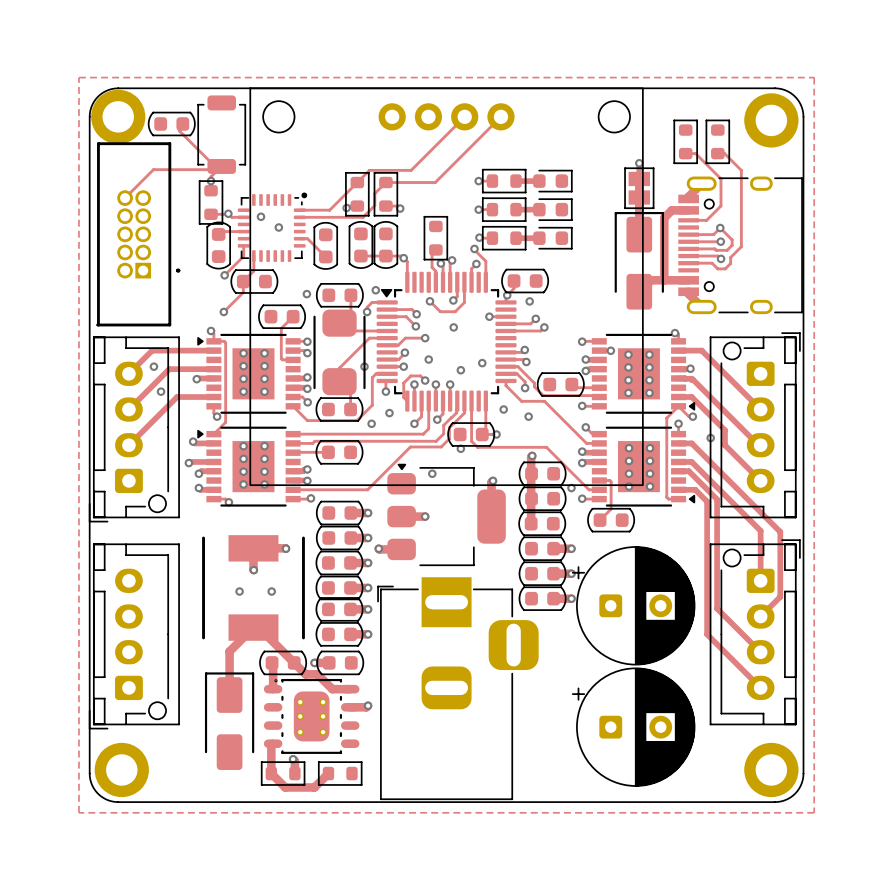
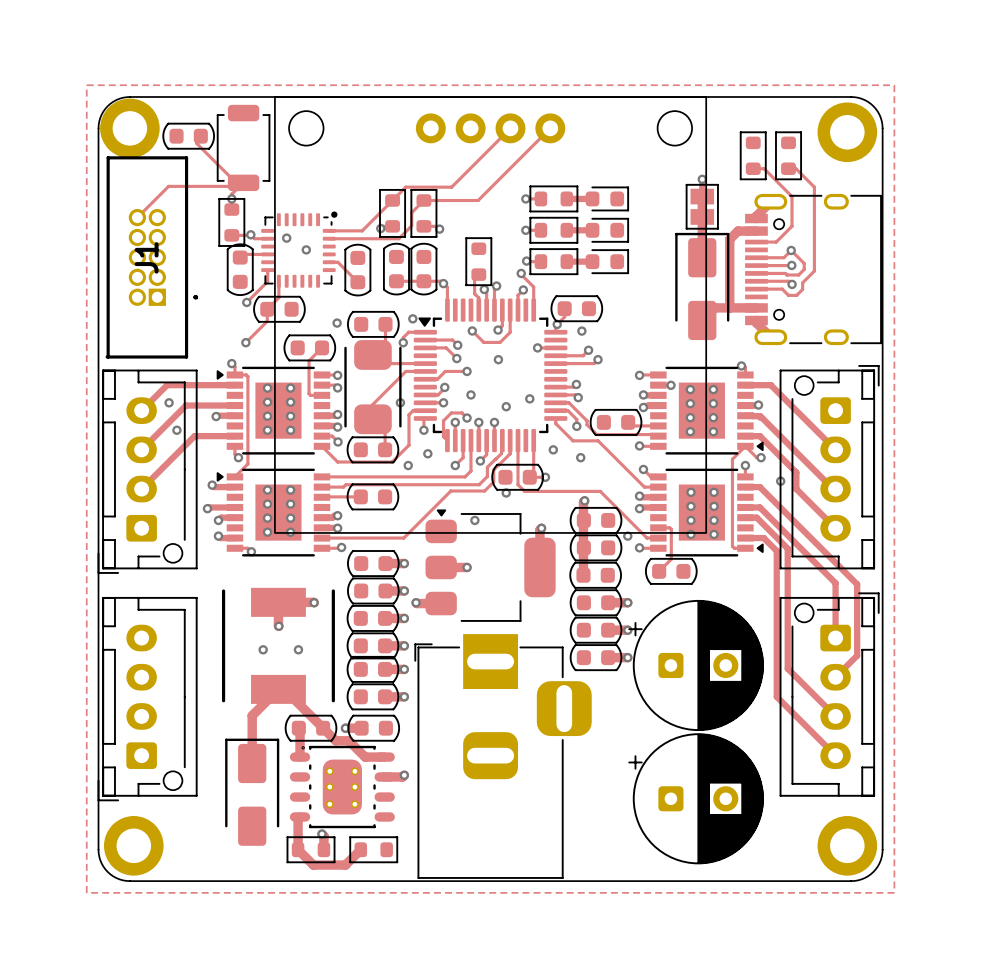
J1 name: none -> J1 (146, 257)

